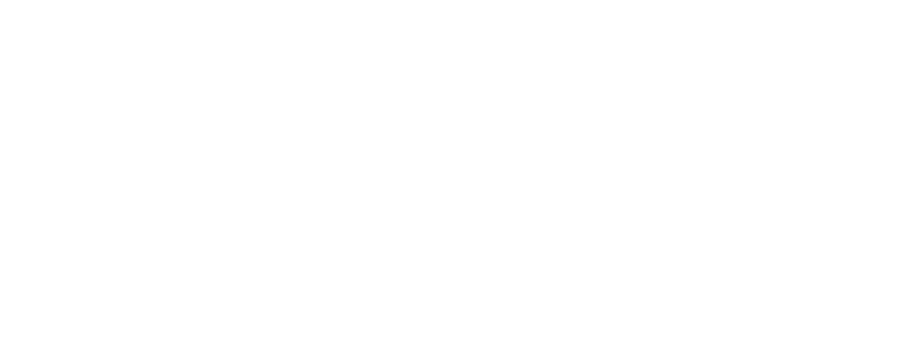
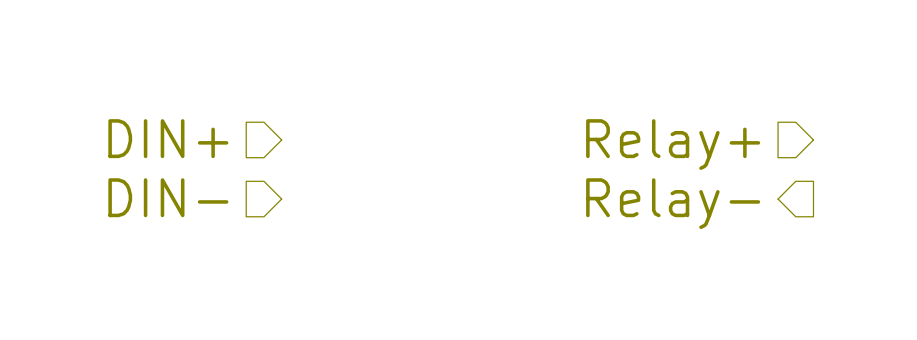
hierarchical label: none -> DIN+ (168, 138)
hierarchical label: none -> Relay+ (673, 144)
hierarchical label: none -> DIN- (168, 197)
hierarchical label: none -> Relay- (673, 203)

